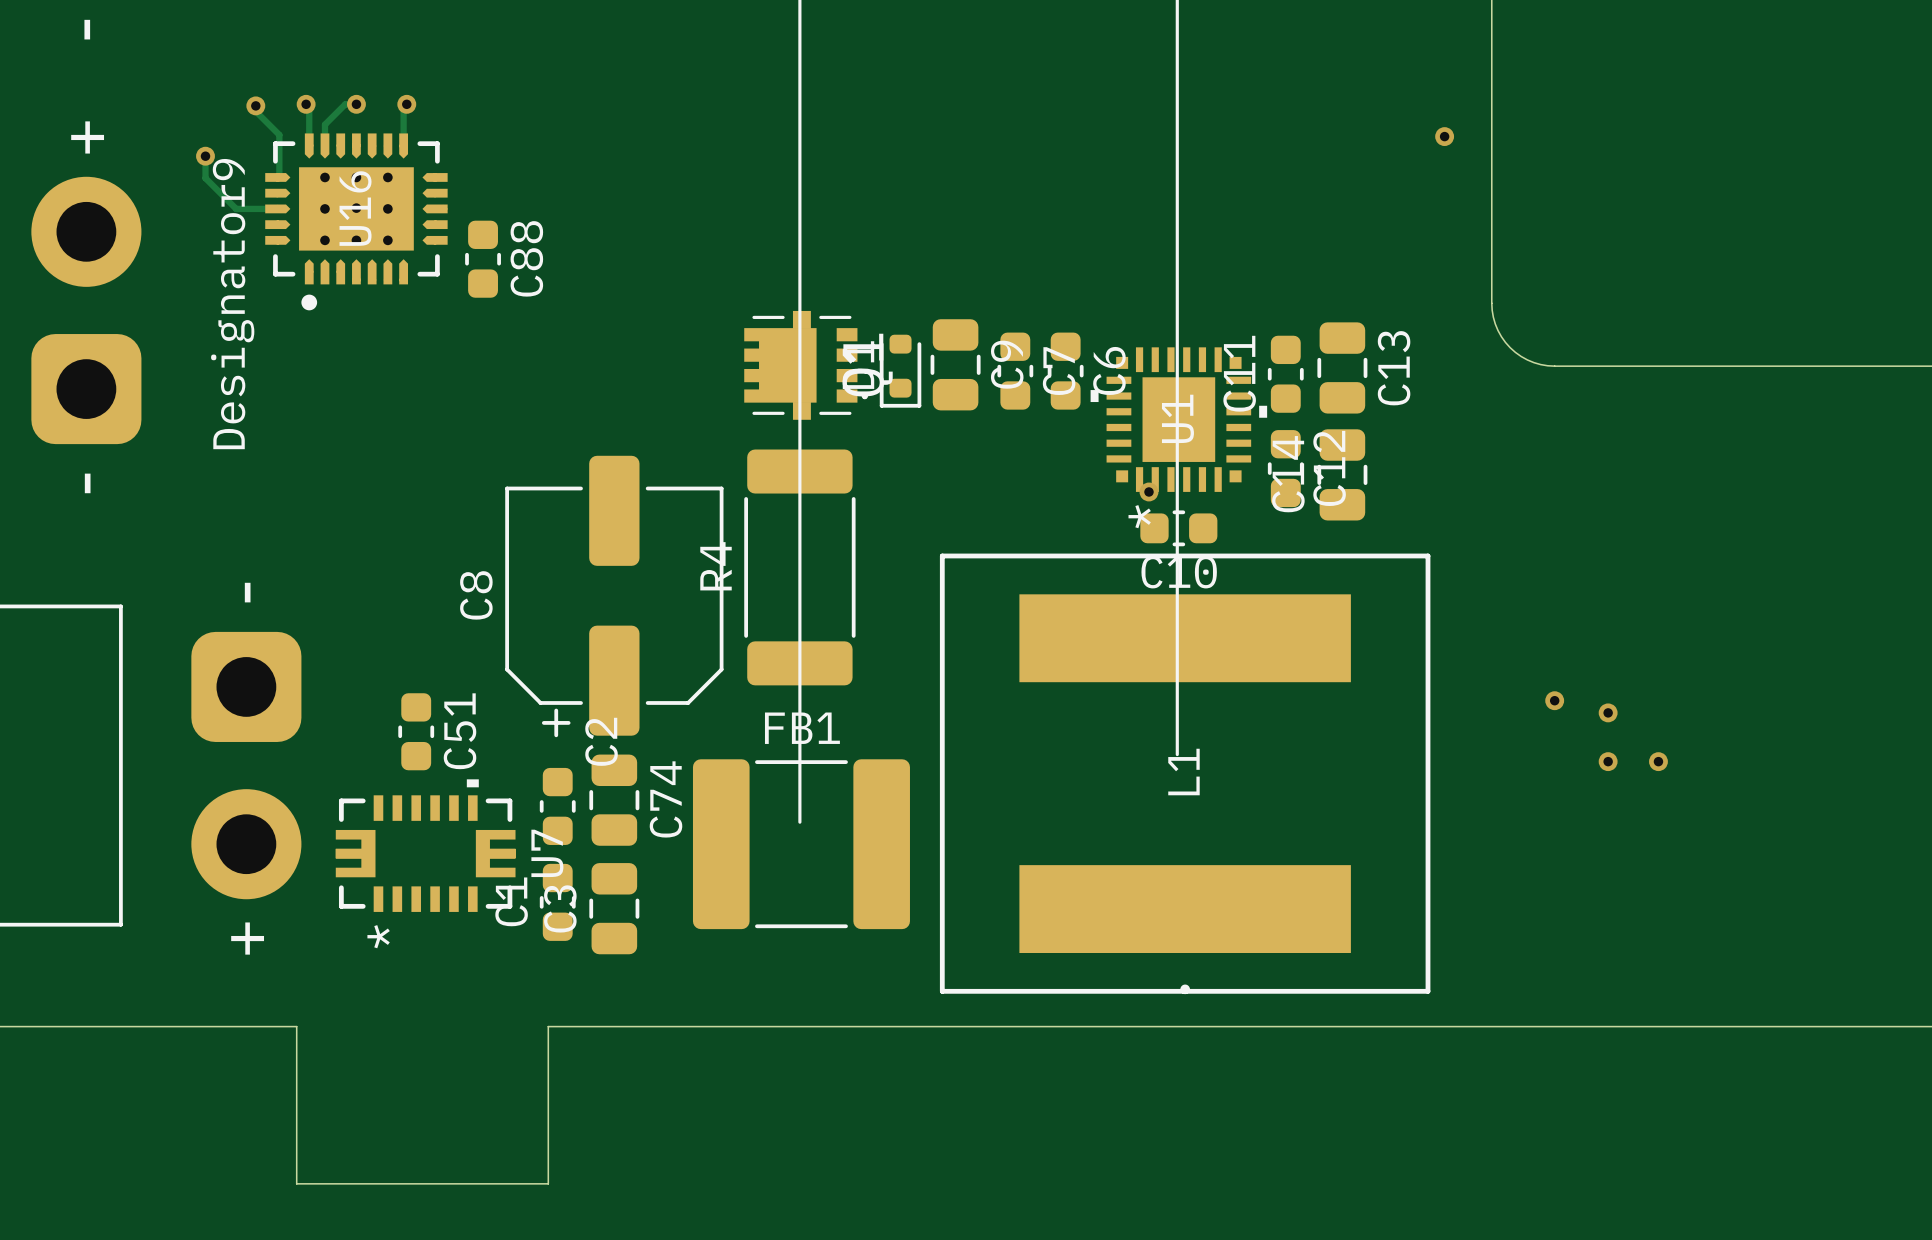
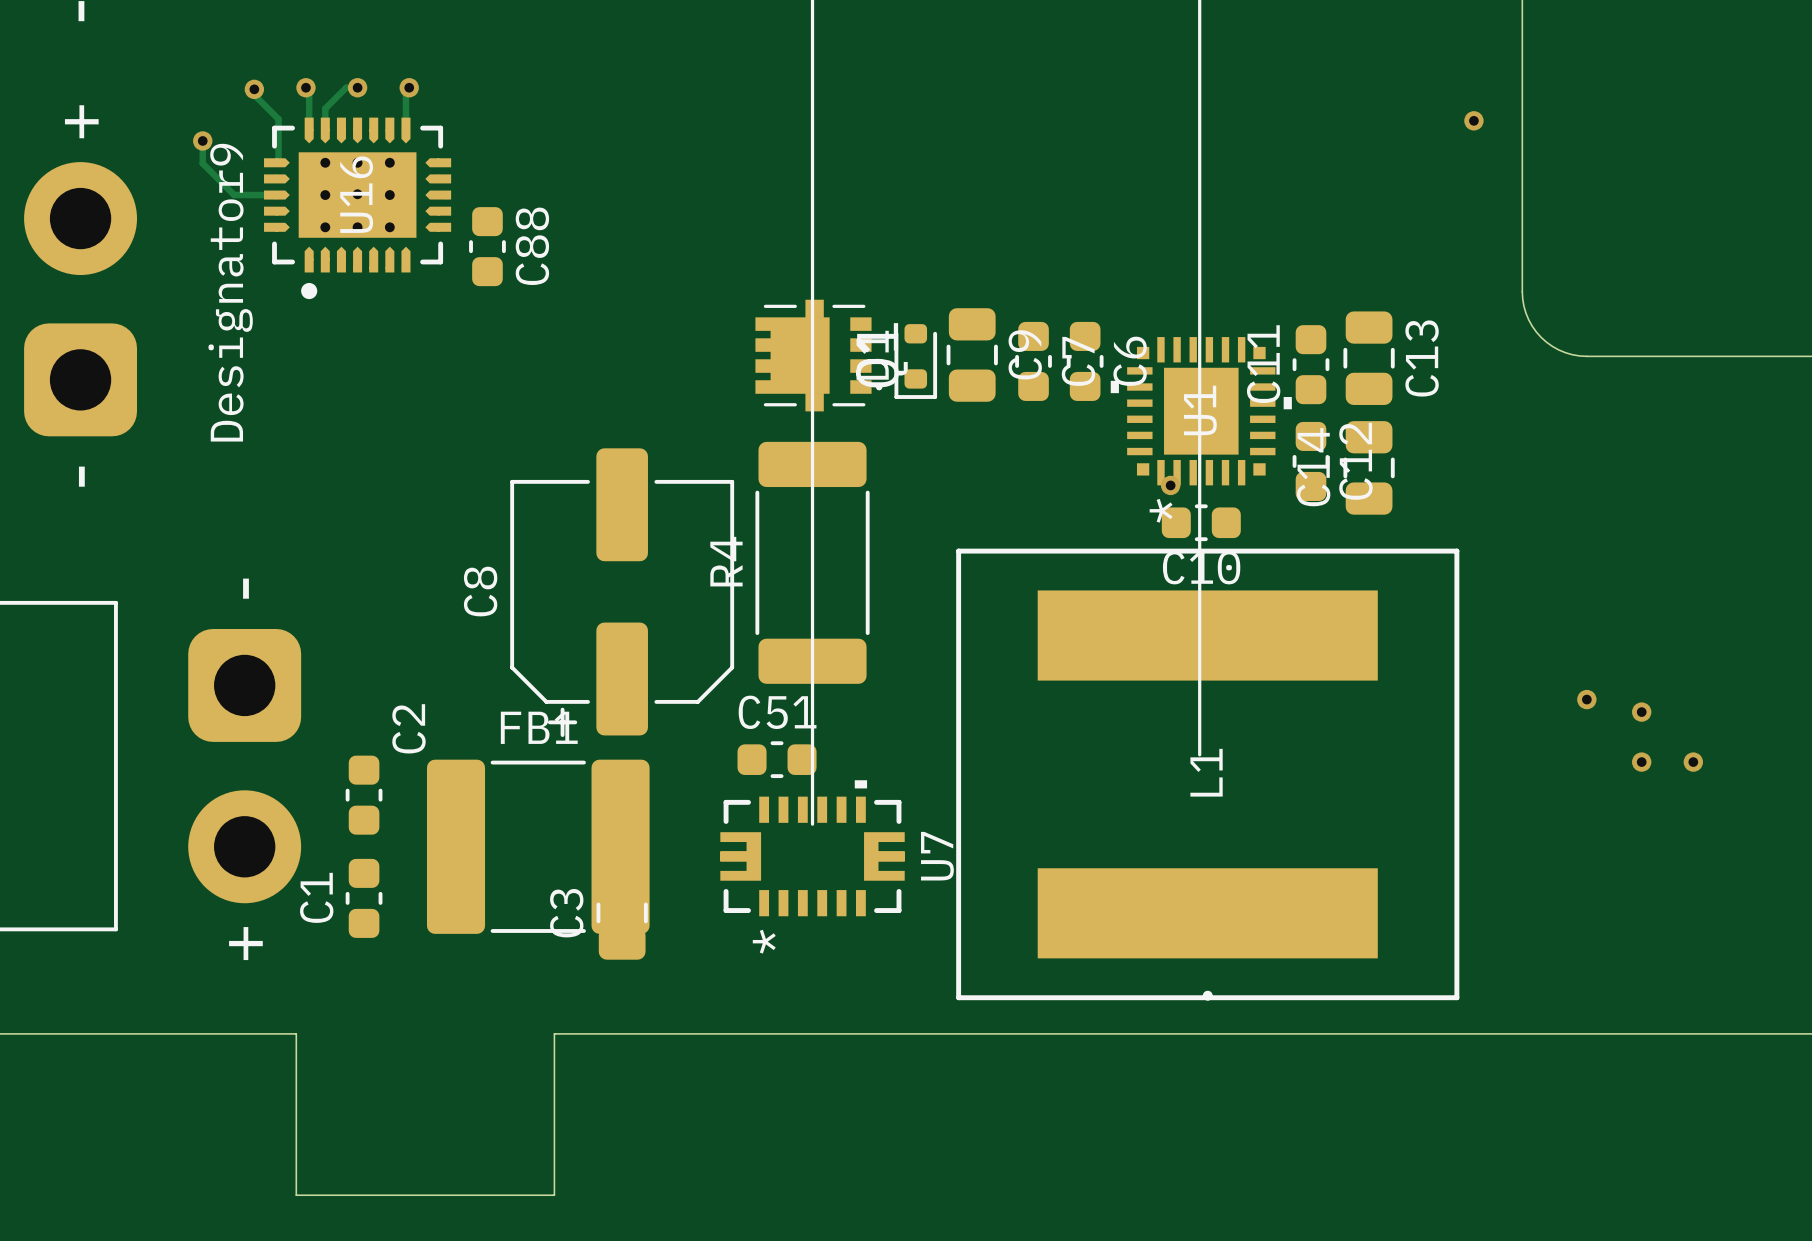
C51 rotation: 0° (416, 731) -> 90° clockwise (777, 759)
C51 position: (416, 731) -> (777, 759)
C51 name position: C51 (460, 731) -> C51 (777, 712)
C74: (614, 800) -> none
C2 position: (557, 806) -> (364, 795)
FB1 position: (801, 844) -> (538, 846)
U7 position: (425, 845) -> (812, 848)
C1 position: (557, 902) -> (364, 898)

